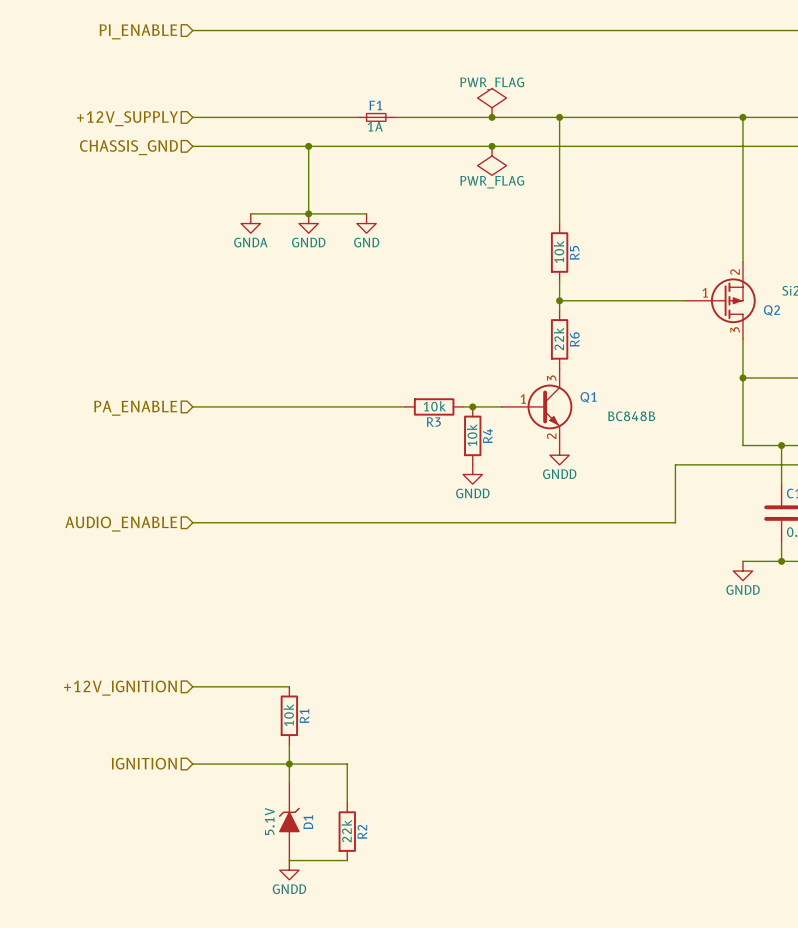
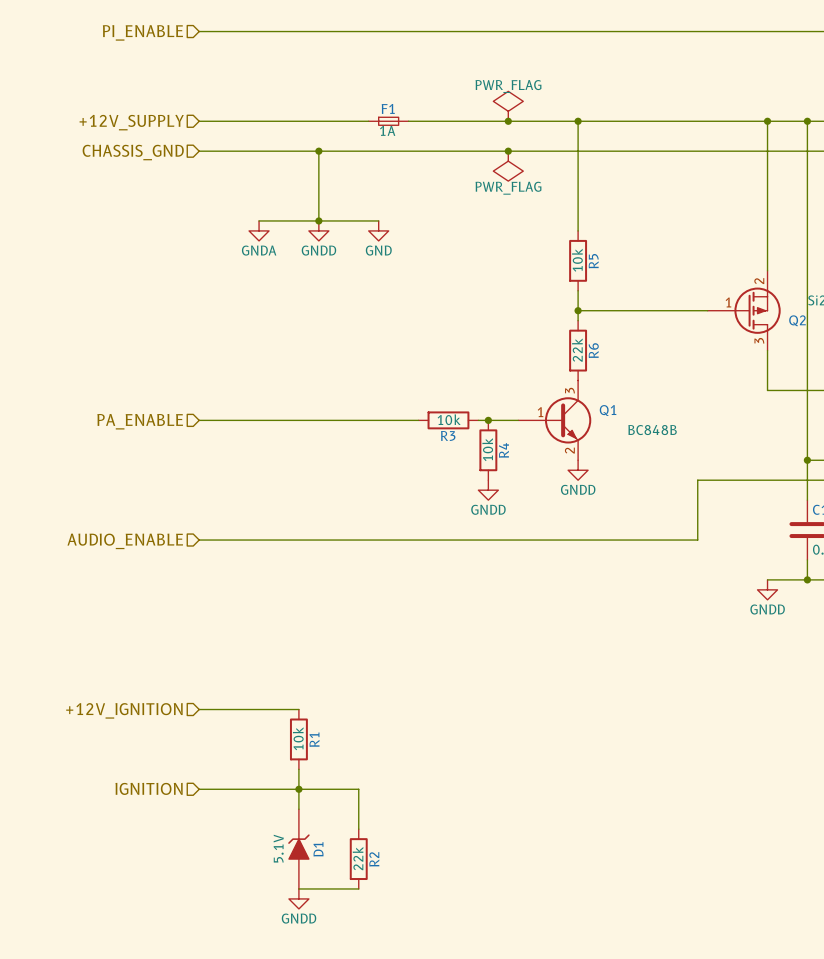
junction: none -> (807, 121)
wire: (742, 377) (742, 445) (781, 445) -> (807, 121) (807, 460)
junction: (742, 377) -> none

